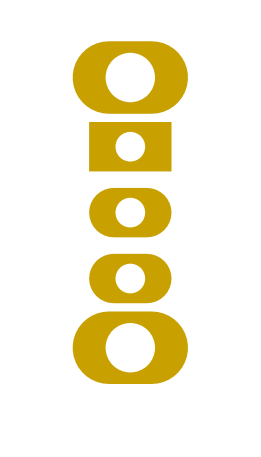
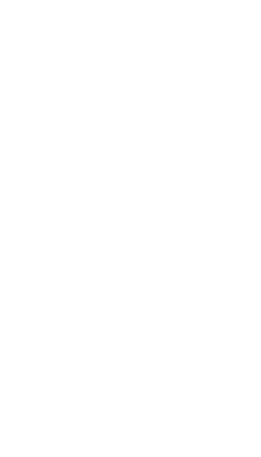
part: (130, 212) -> none

